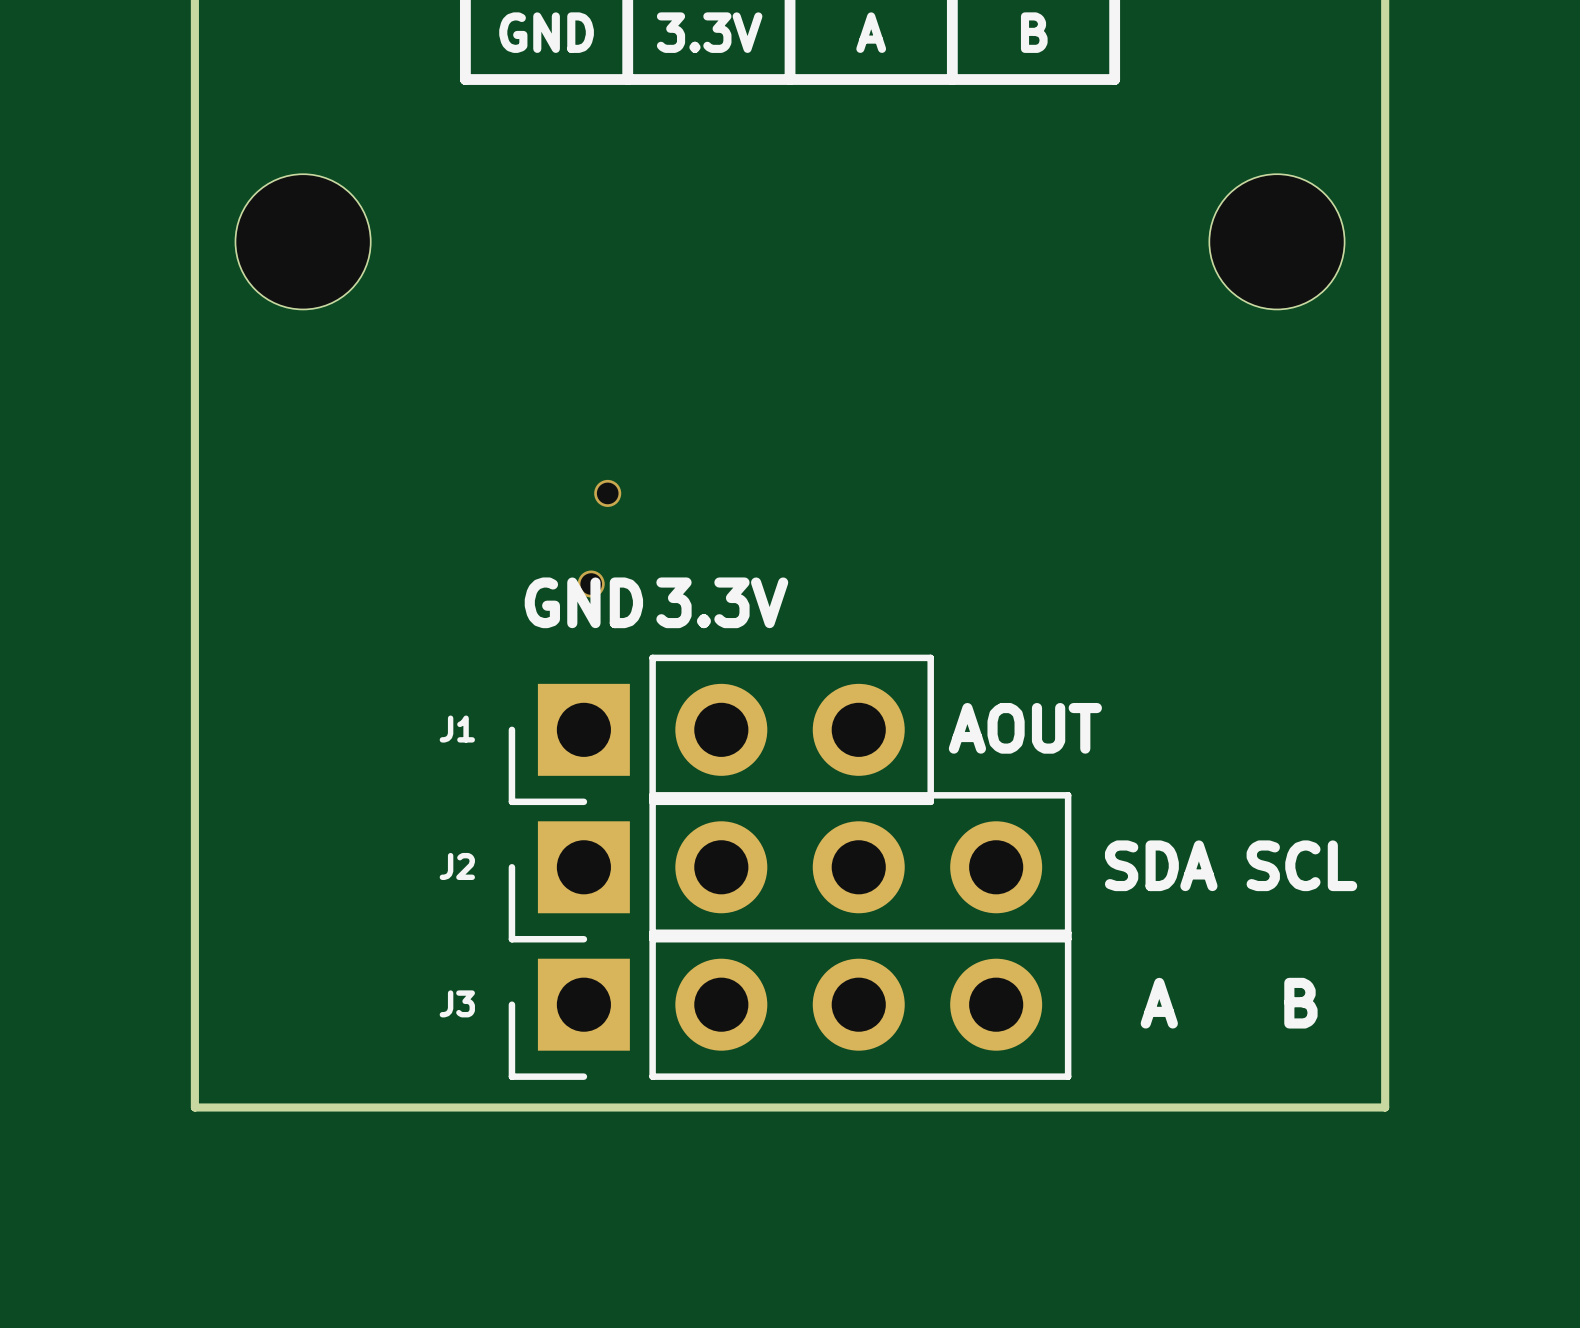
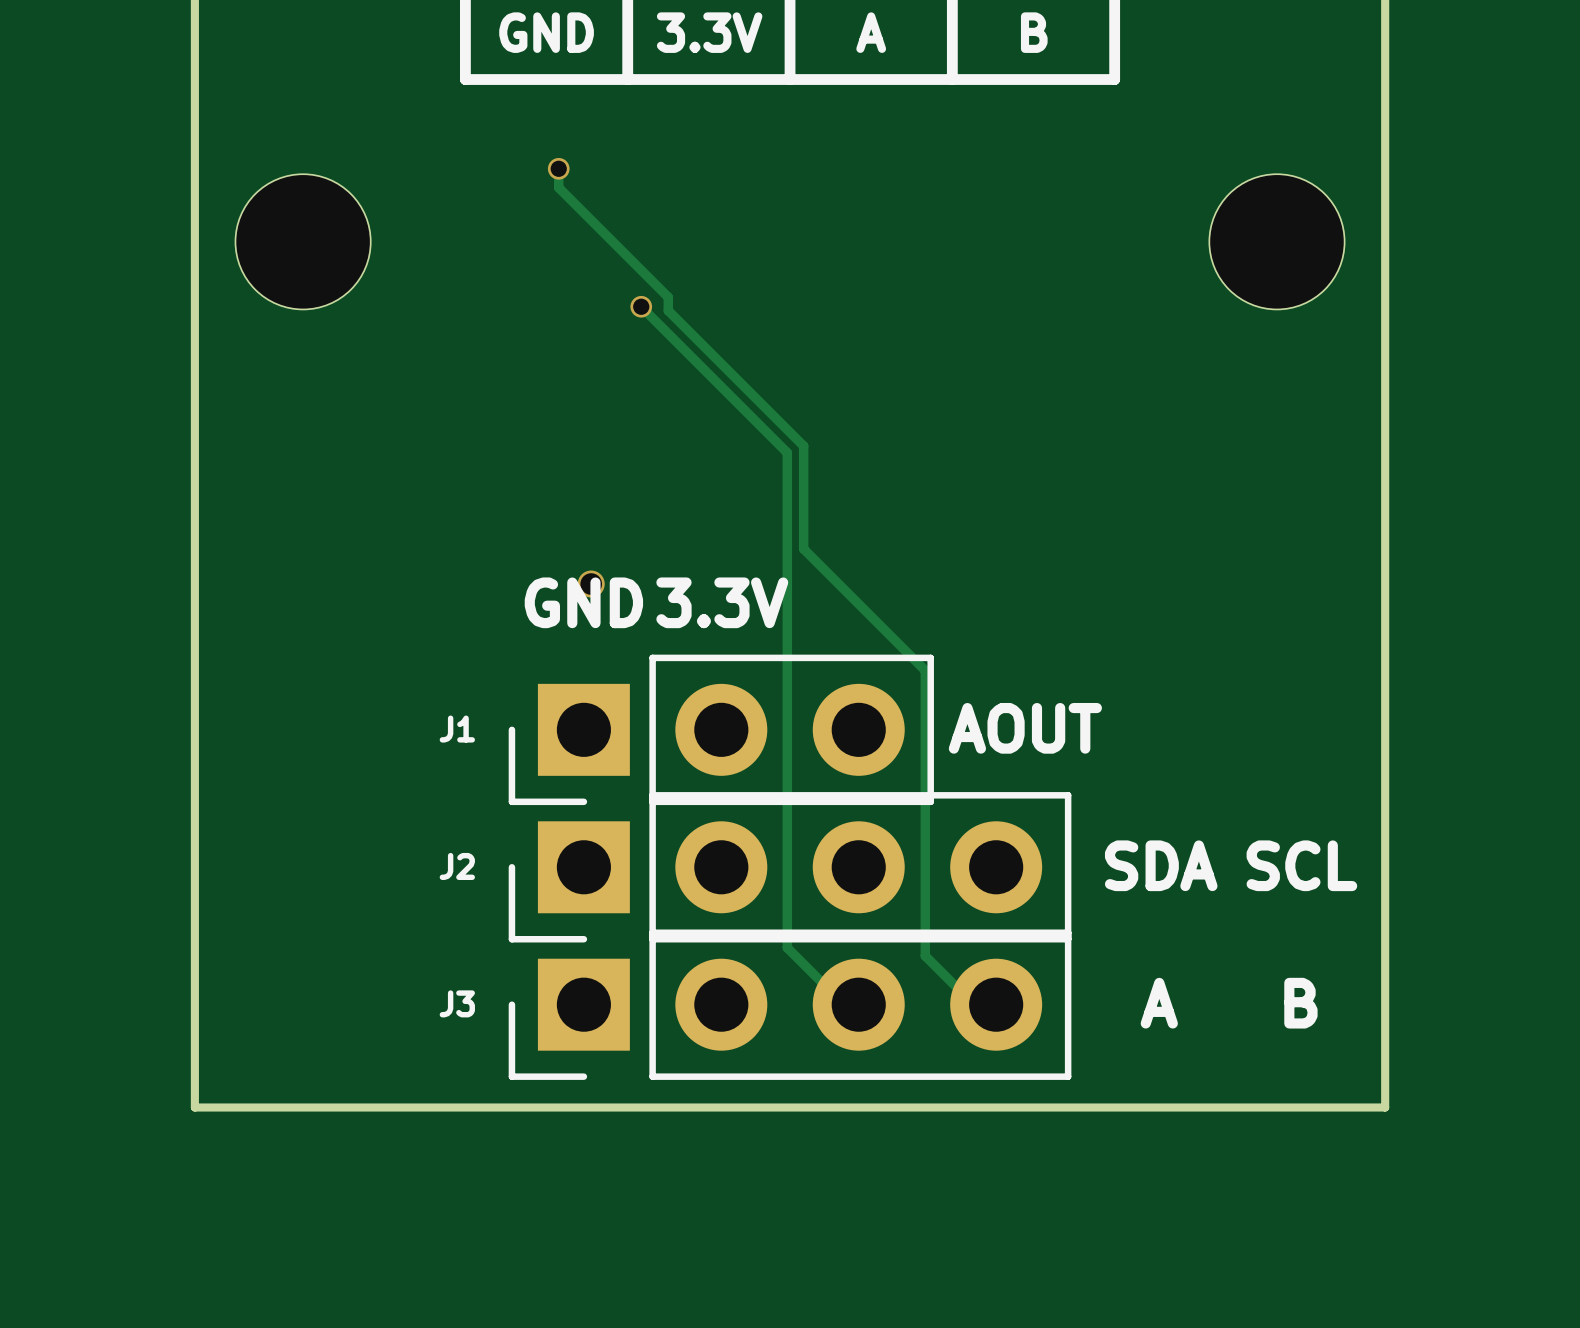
track: none -> (558, 168) (558, 187) (668, 297) (668, 310) (803, 446) (803, 548) (925, 670) (925, 956) (973, 1004) (996, 1004)
via: none -> (558, 168)
track: none -> (641, 306) (787, 452) (787, 947) (844, 1004) (858, 1004)
via: none -> (641, 306)
via: (607, 493) -> none

